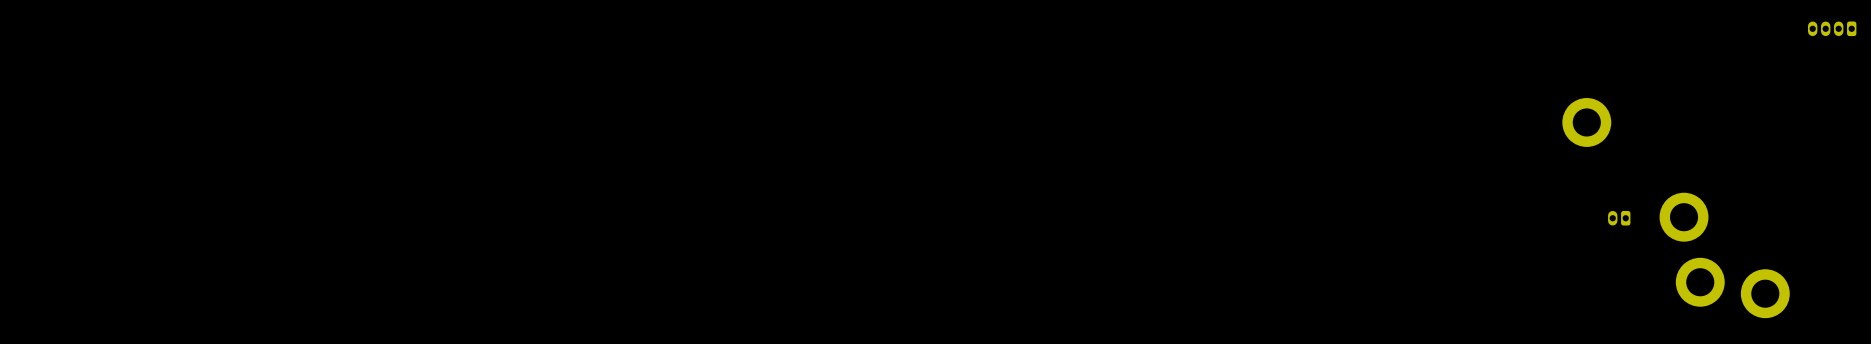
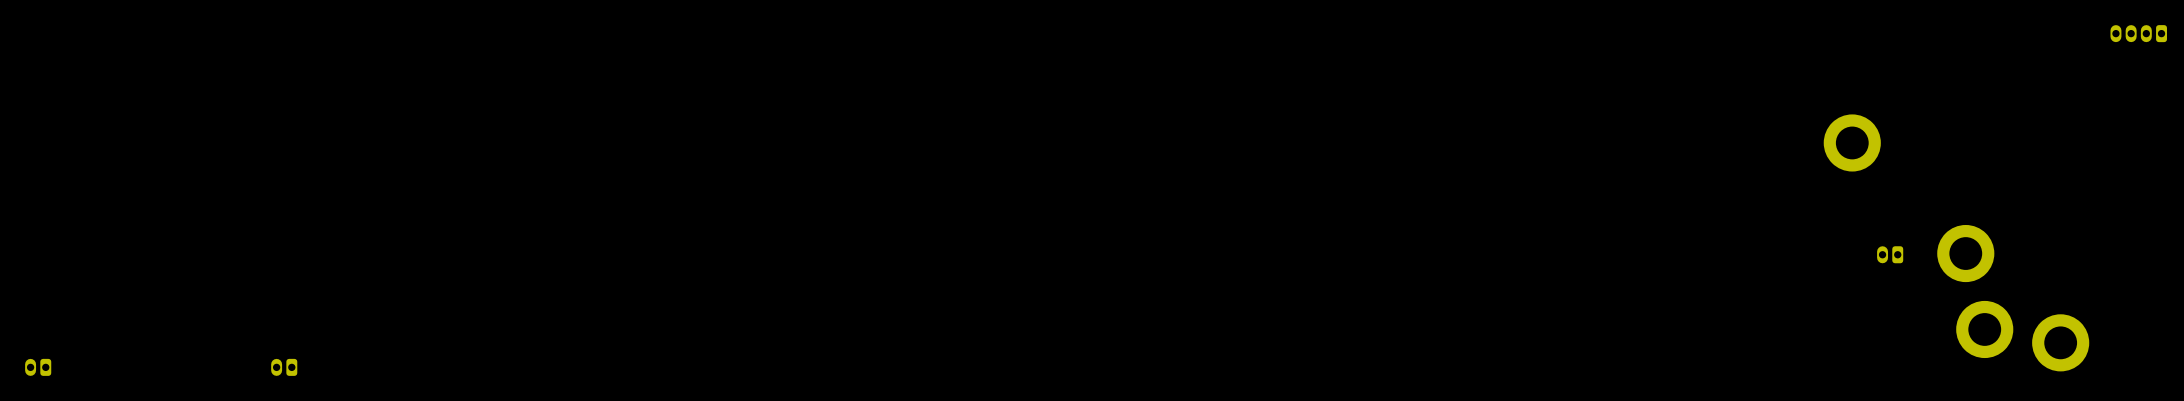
part: none -> (38, 367)
part: none -> (284, 367)

